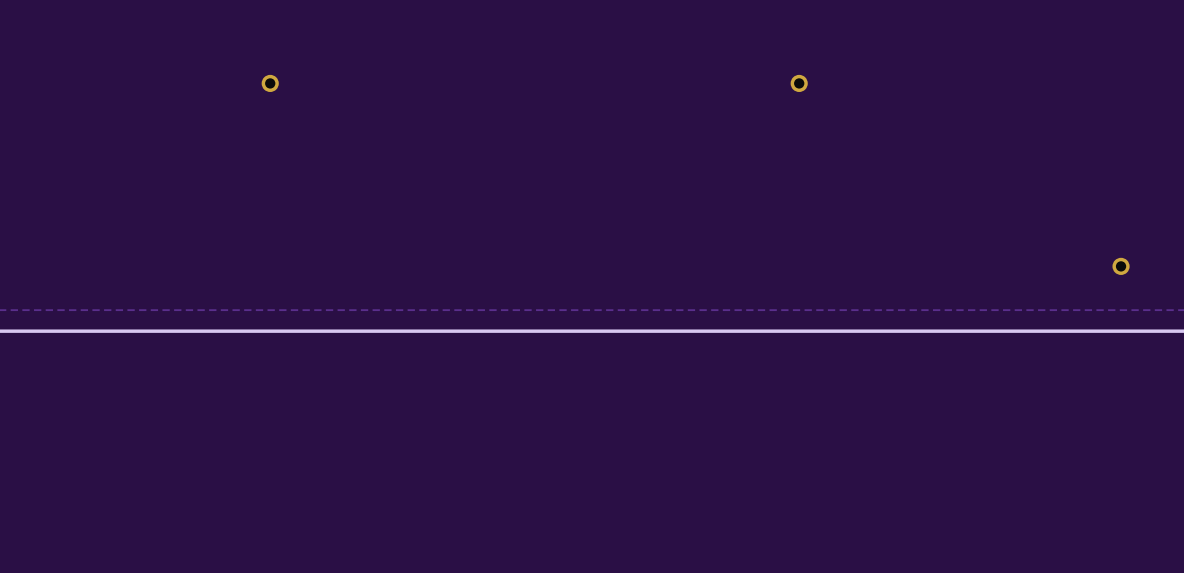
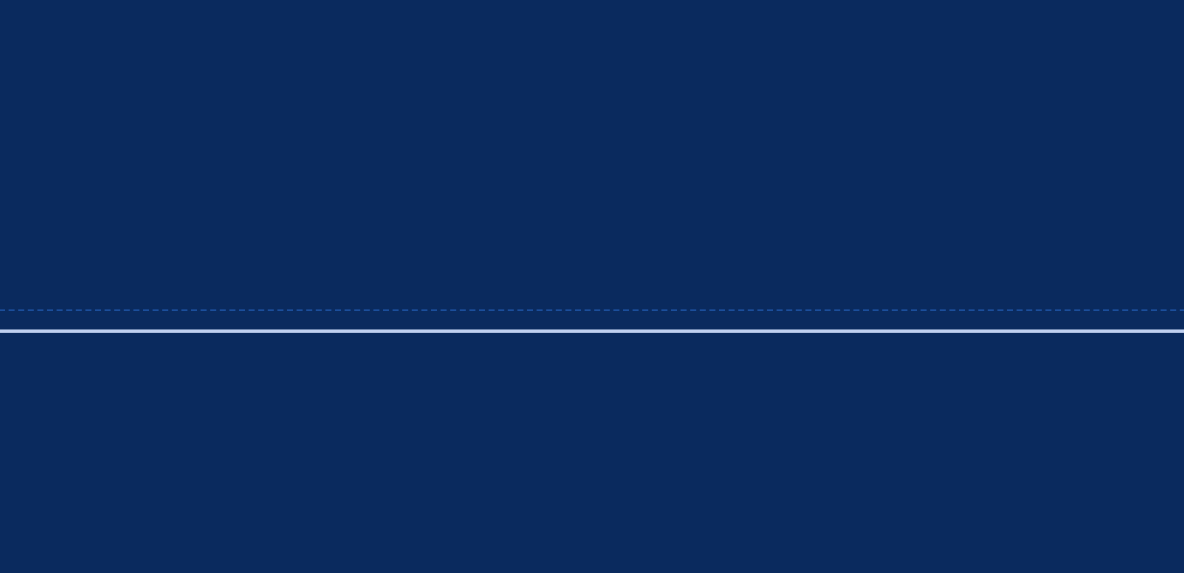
via: (270, 83) -> none
via: (799, 83) -> none
via: (1121, 266) -> none

